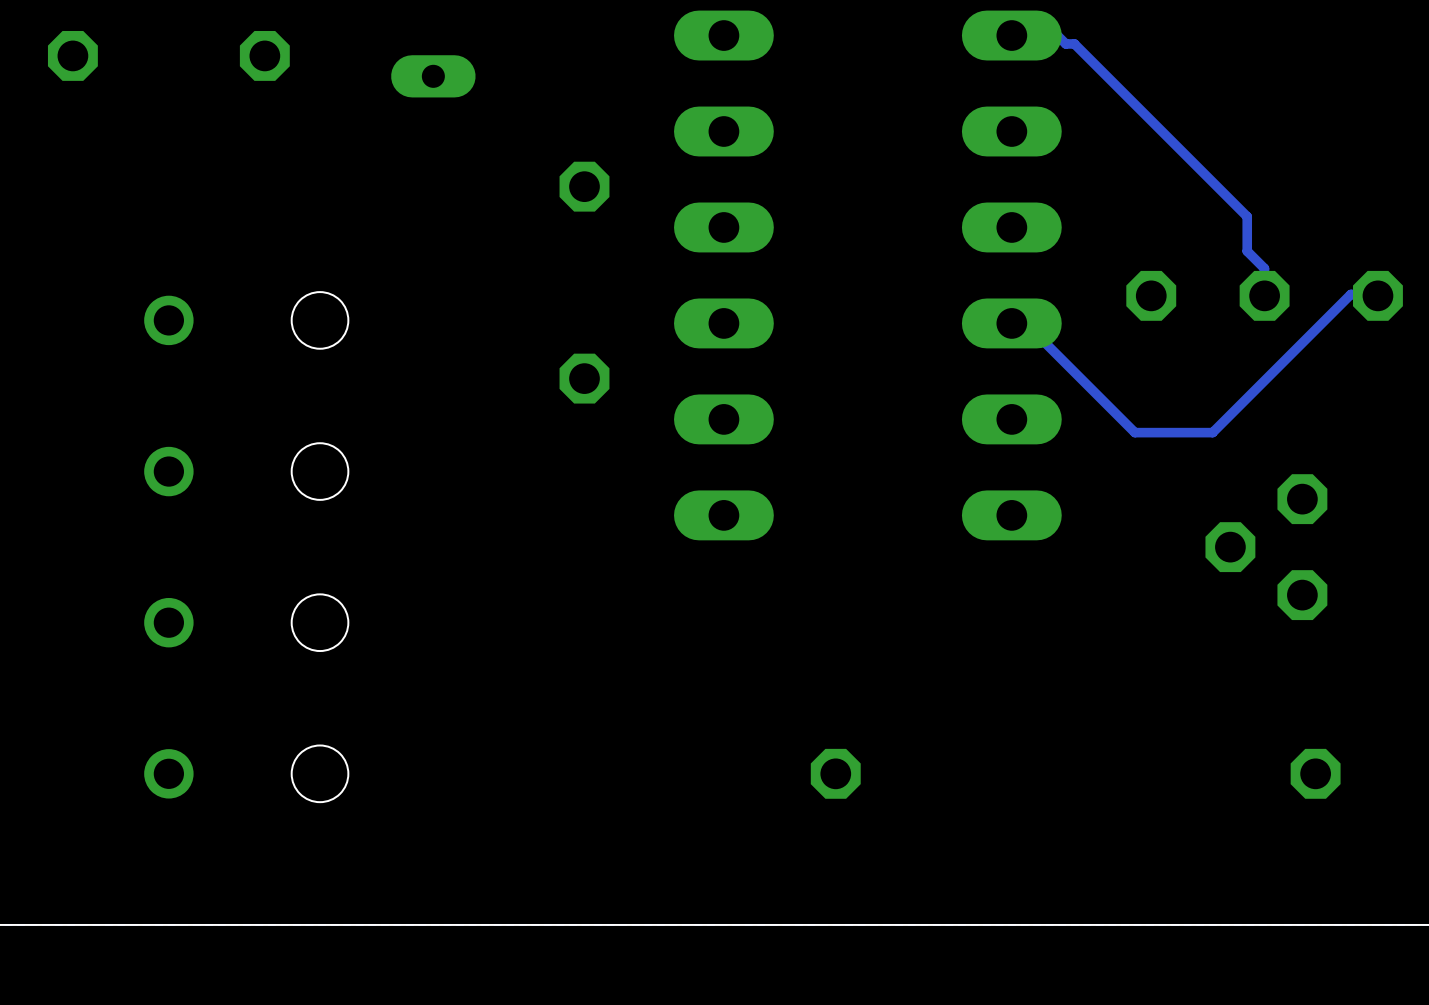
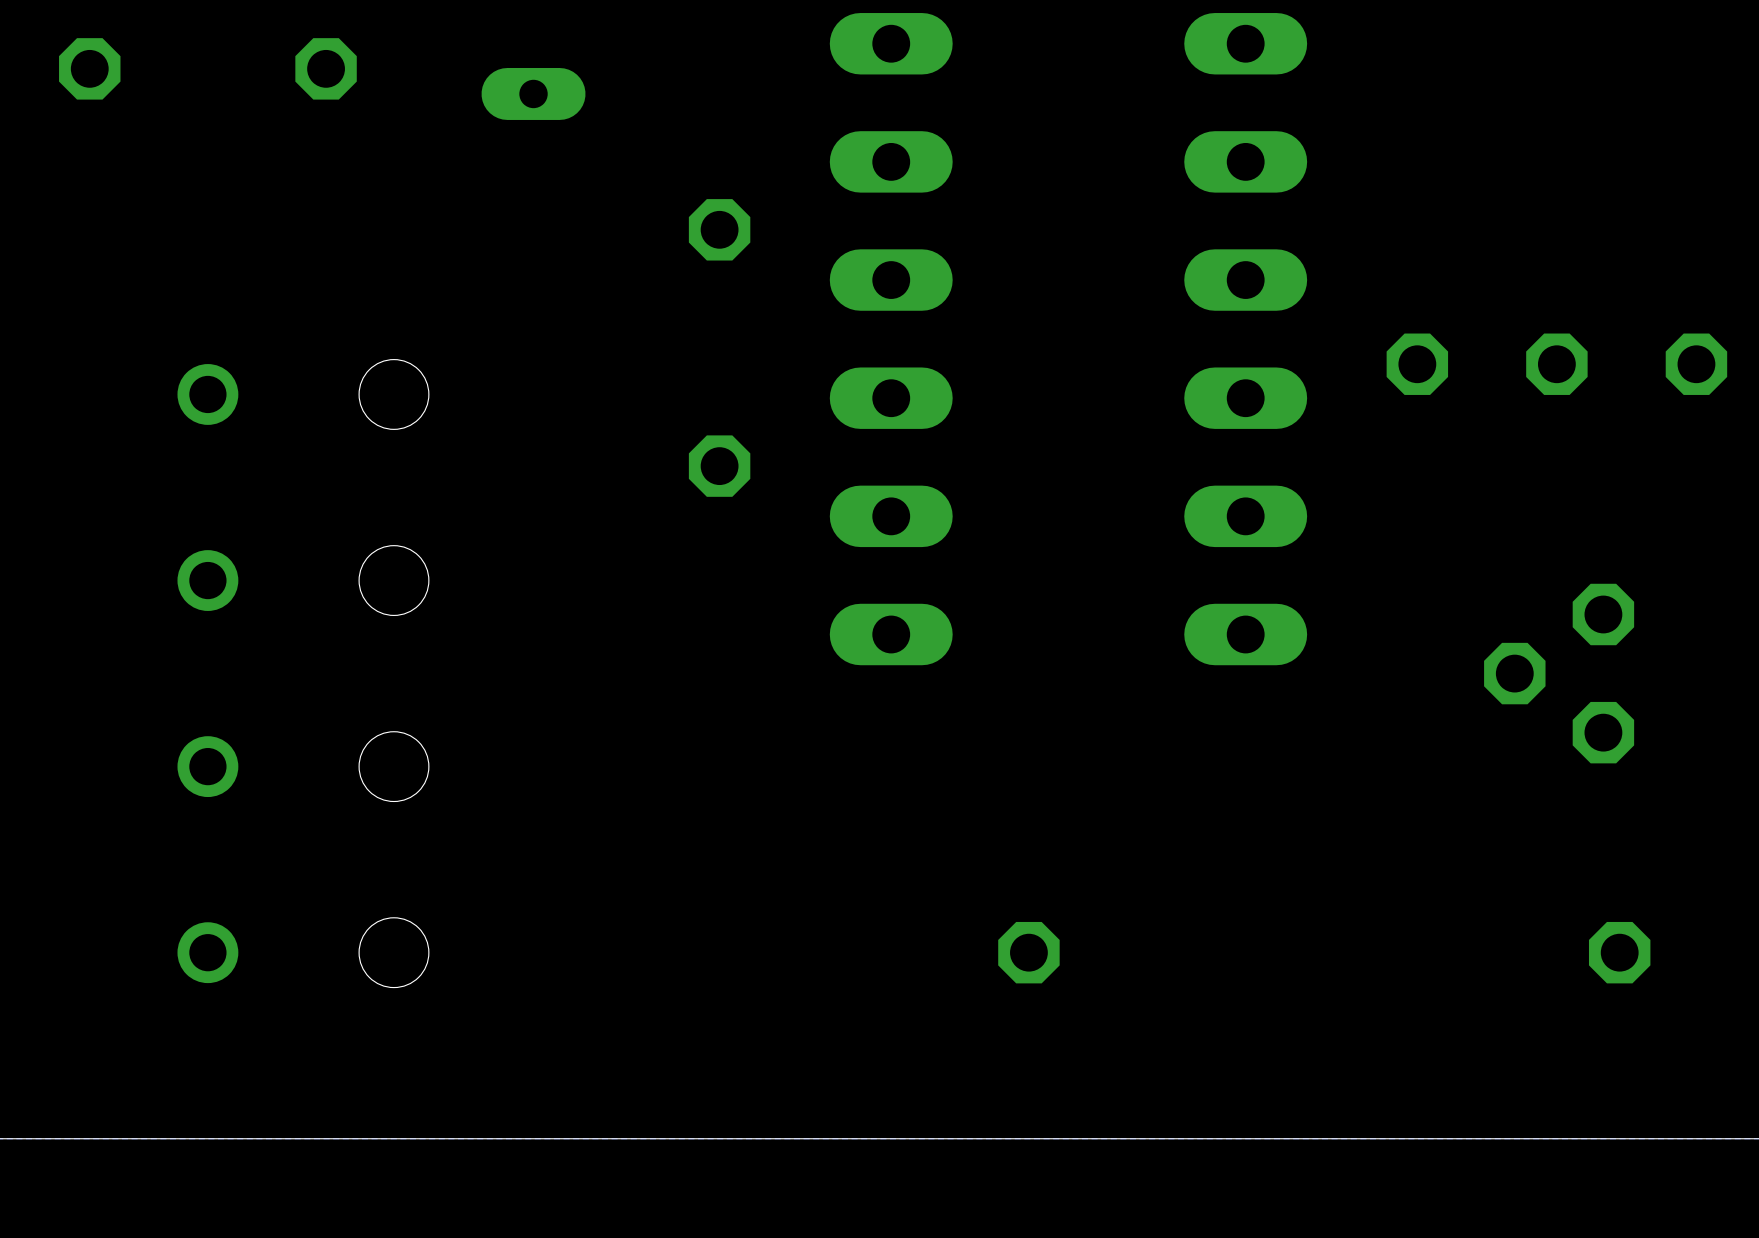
track: (1011, 35) (1057, 35) (1065, 43) (1074, 43) (1247, 216) (1247, 251) (1264, 268) (1264, 295) -> none
track: (1377, 295) (1350, 294) (1212, 432) (1134, 432) (1031, 328) (1014, 328) (1011, 323) -> none

